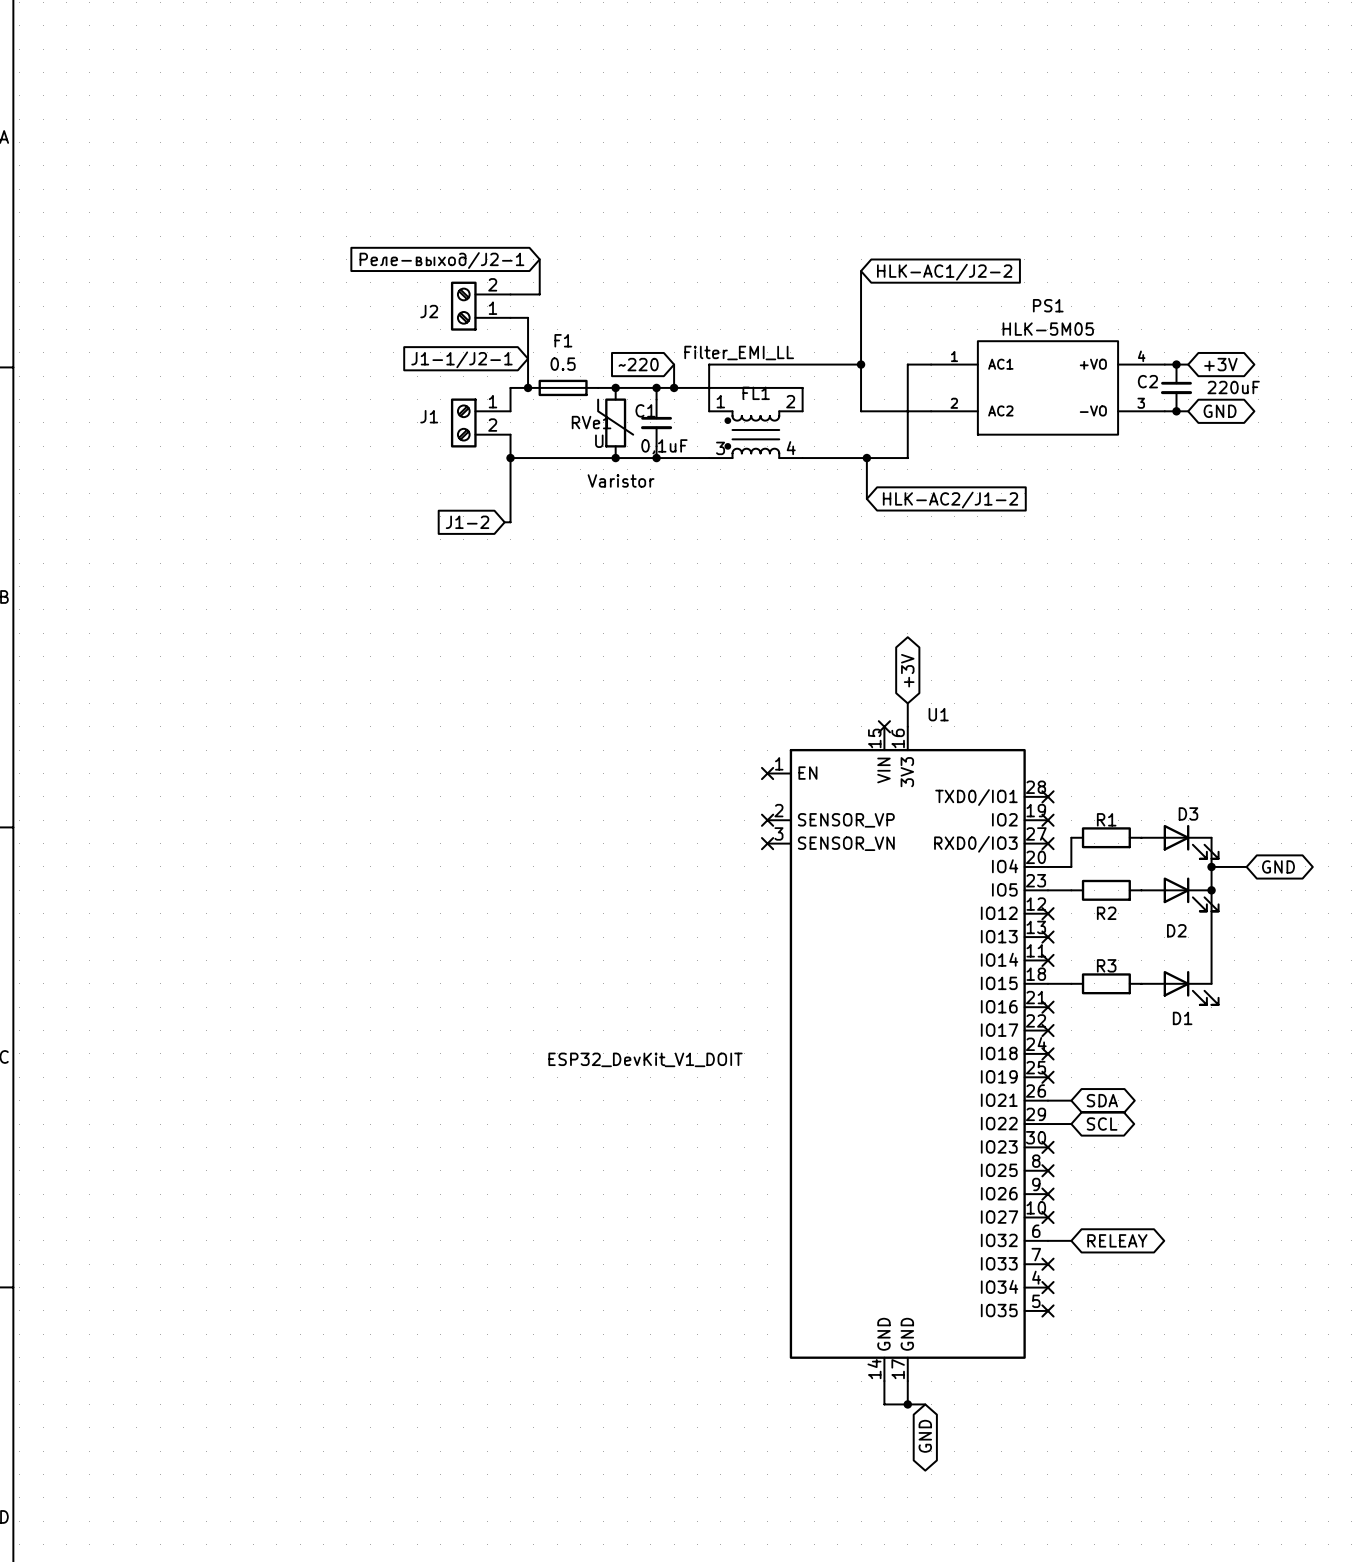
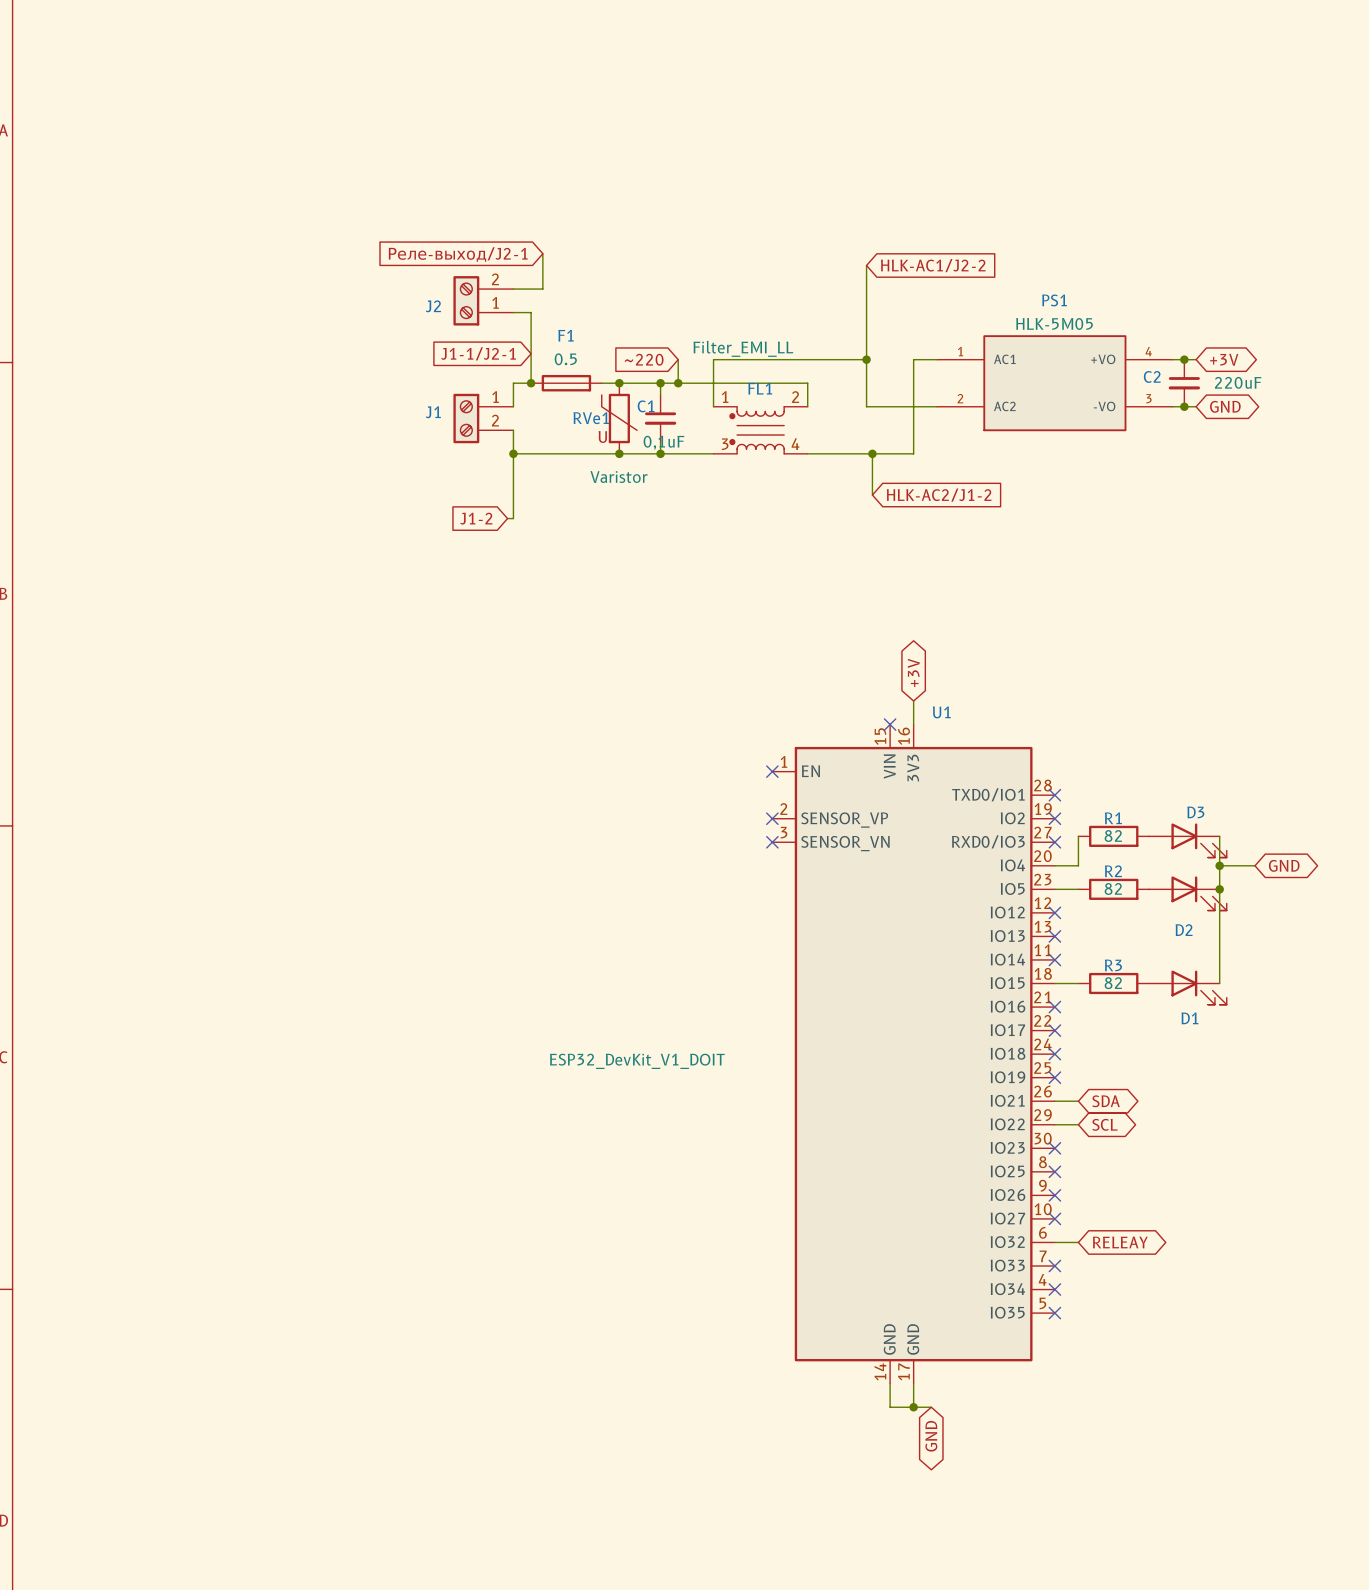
R1 value: none -> 82 (1113, 836)
R2 value: none -> 82 (1113, 888)
R2 name position: R2 (1106, 913) -> R2 (1113, 871)
R3 value: none -> 82 (1113, 983)

